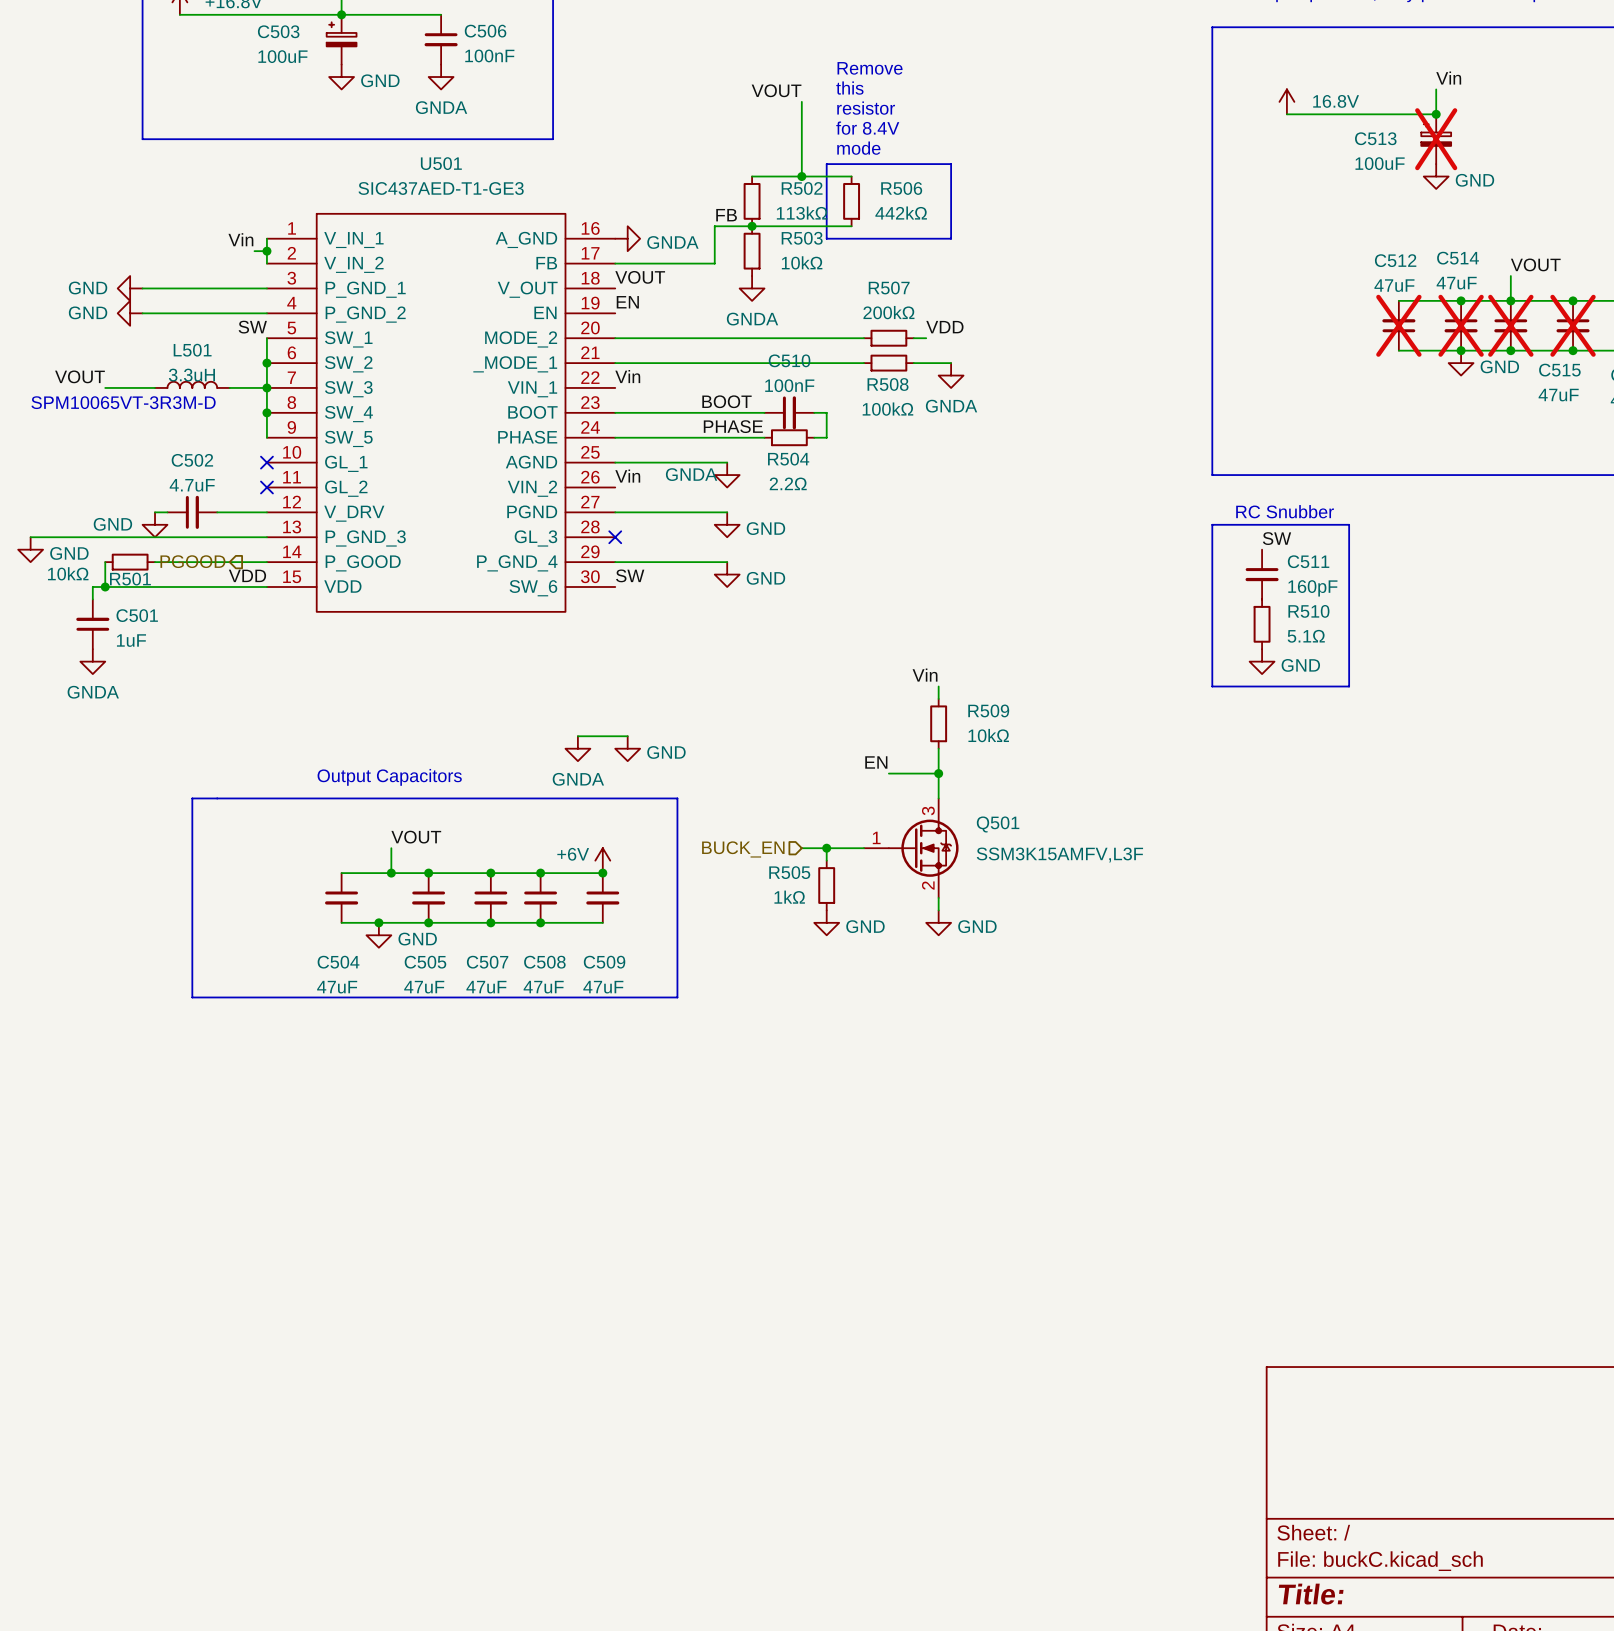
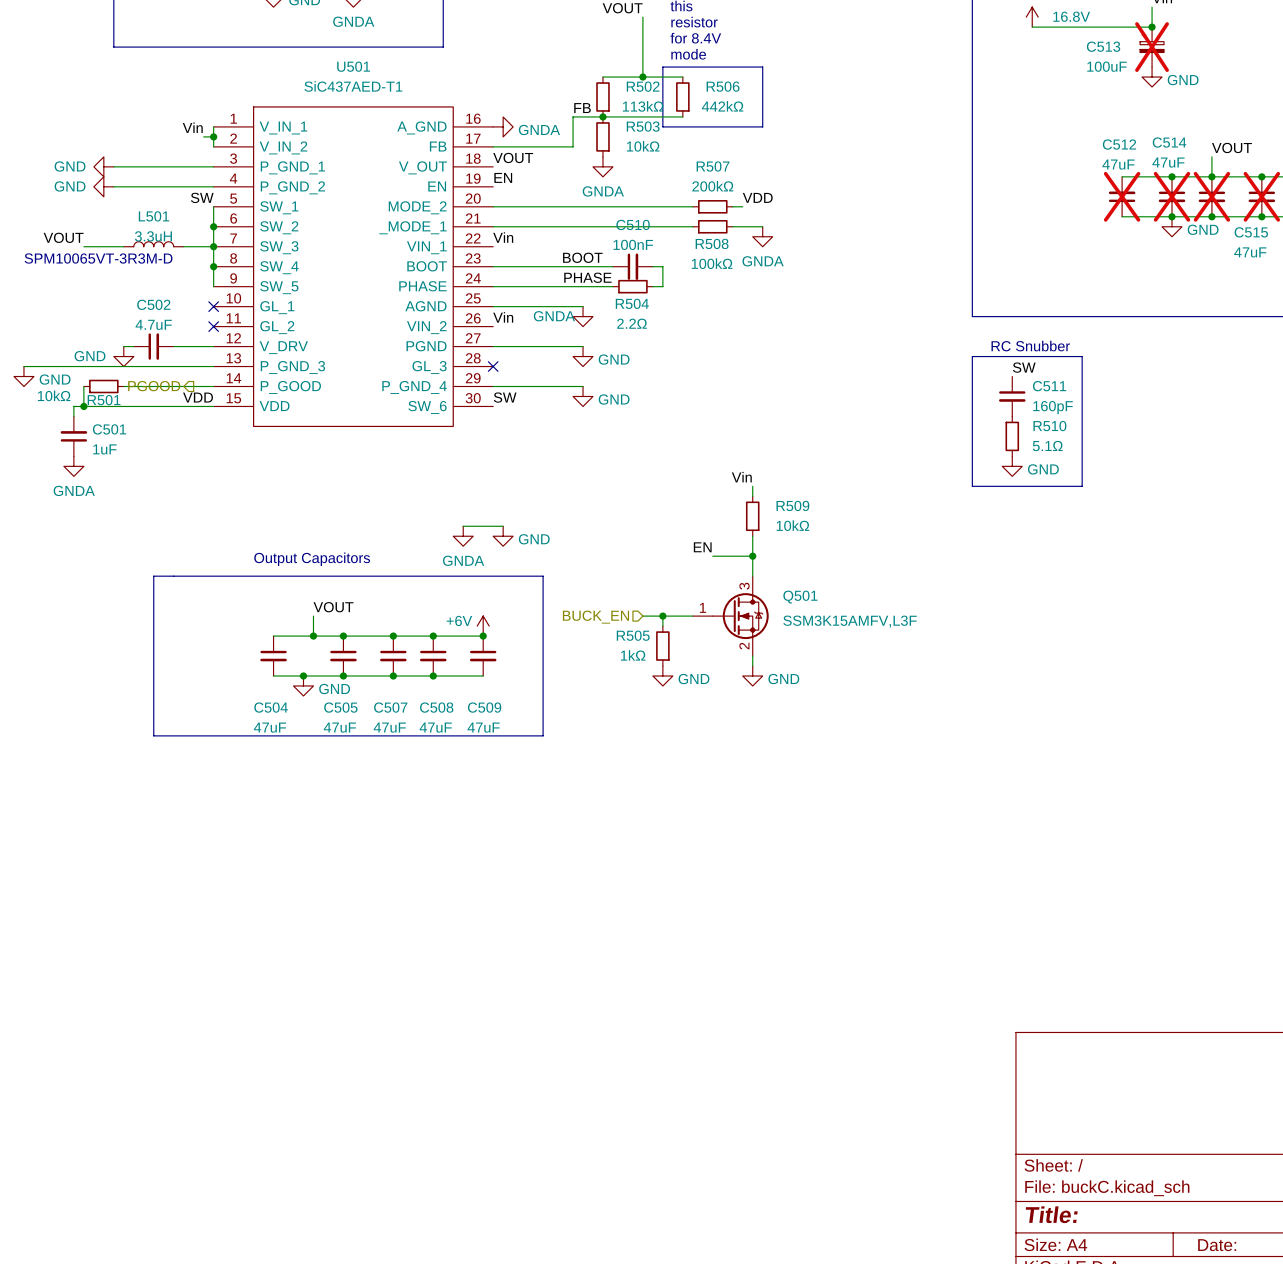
U501 value: SIC437AED-T1-GE3 (441, 188) -> SiC437AED-T1 (353, 86)

